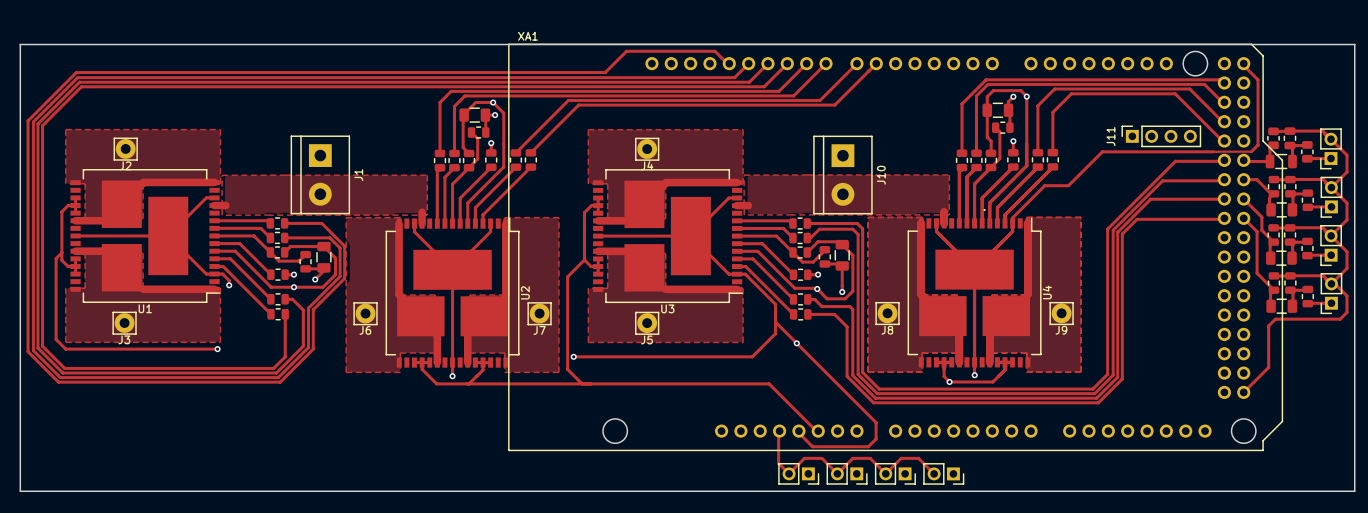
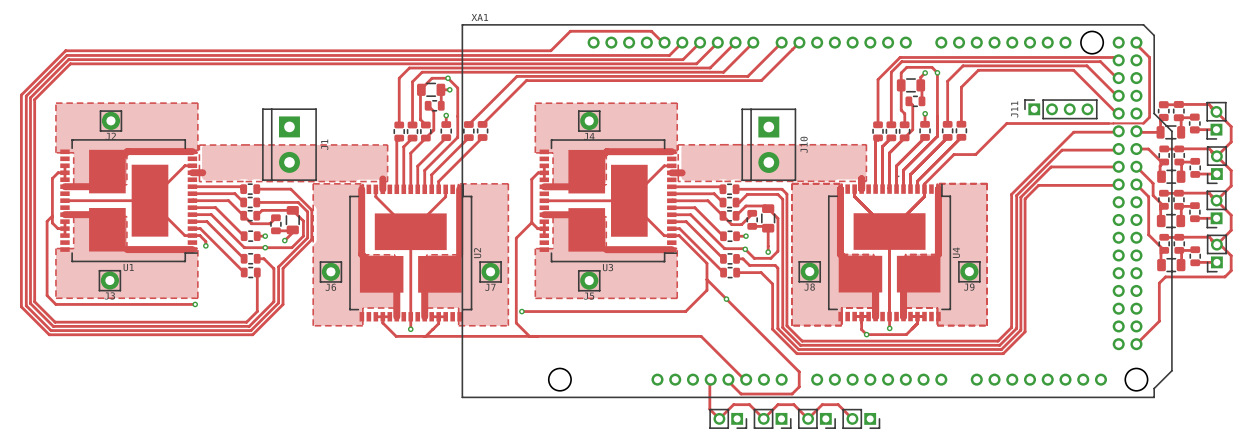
board edge: (20, 44) (1354, 44) (1354, 491) (20, 491) (20, 44) -> none

